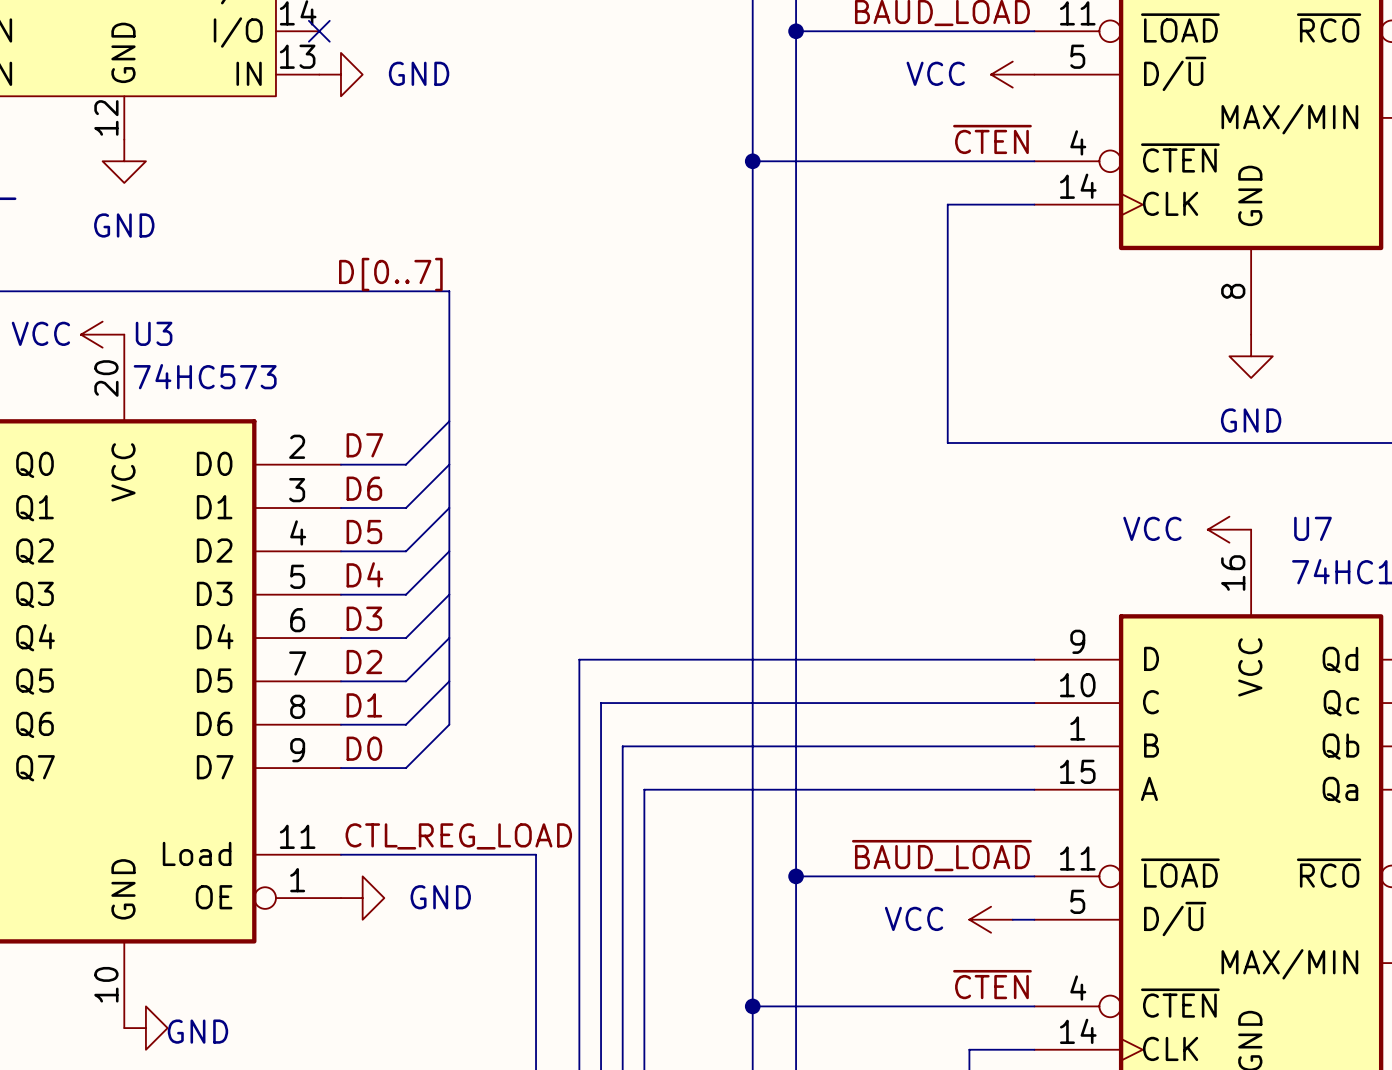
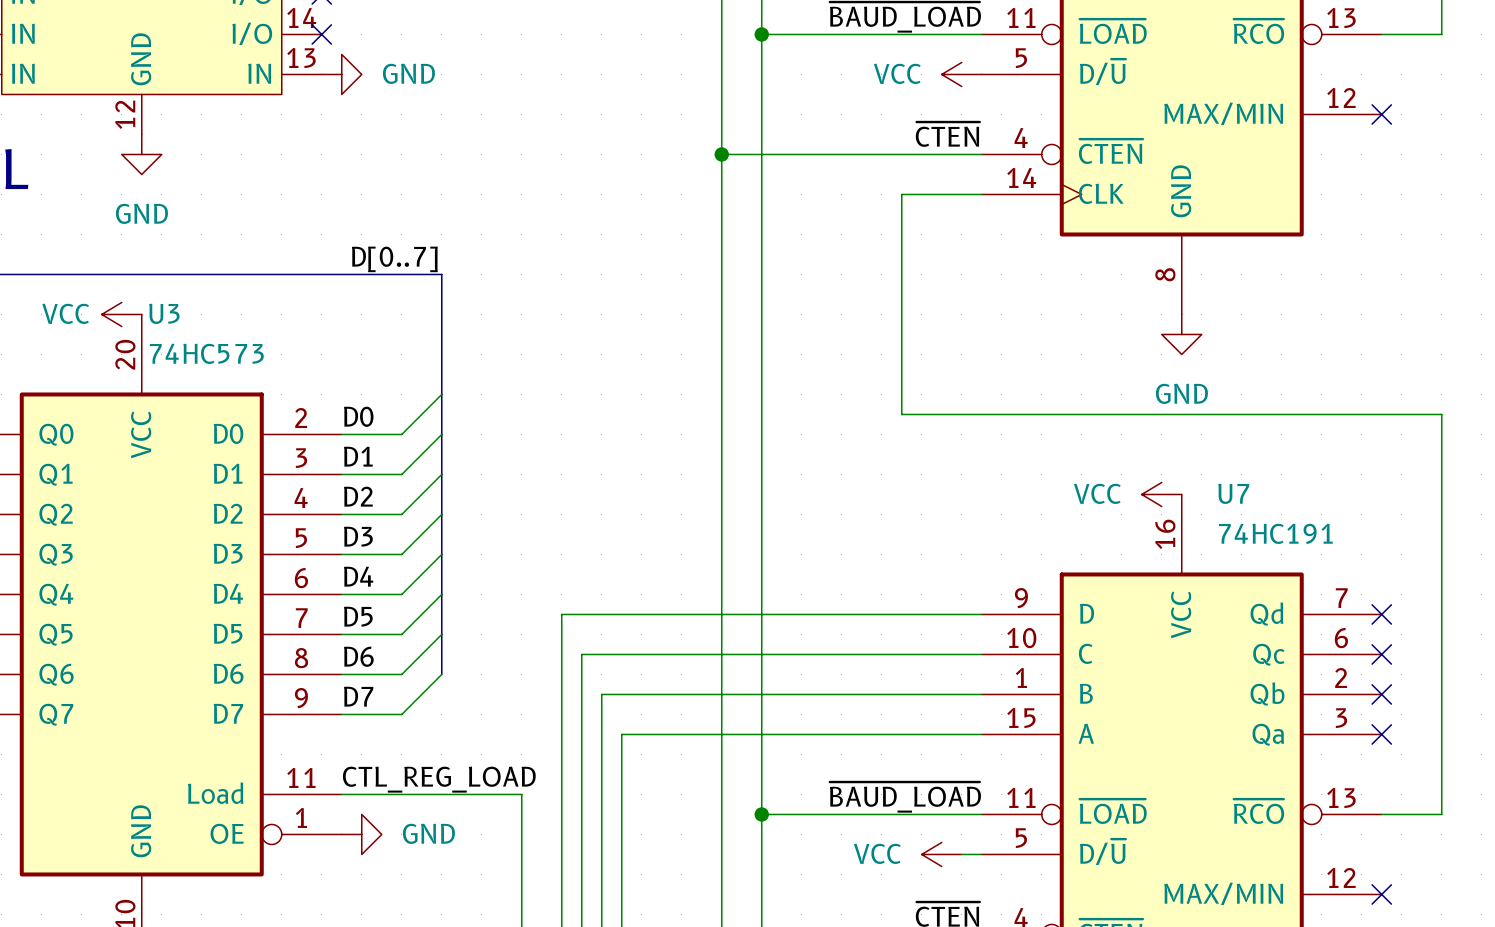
label: D7 (364, 445) -> D0 (358, 416)
label: D6 (364, 488) -> D1 (358, 456)
label: D5 (364, 532) -> D2 (358, 496)
label: D4 (364, 574) -> D3 (358, 536)
label: D3 (364, 618) -> D4 (358, 576)
label: D2 (364, 662) -> D5 (358, 616)
label: D1 (364, 705) -> D6 (358, 656)
label: D0 (364, 748) -> D7 (358, 696)

